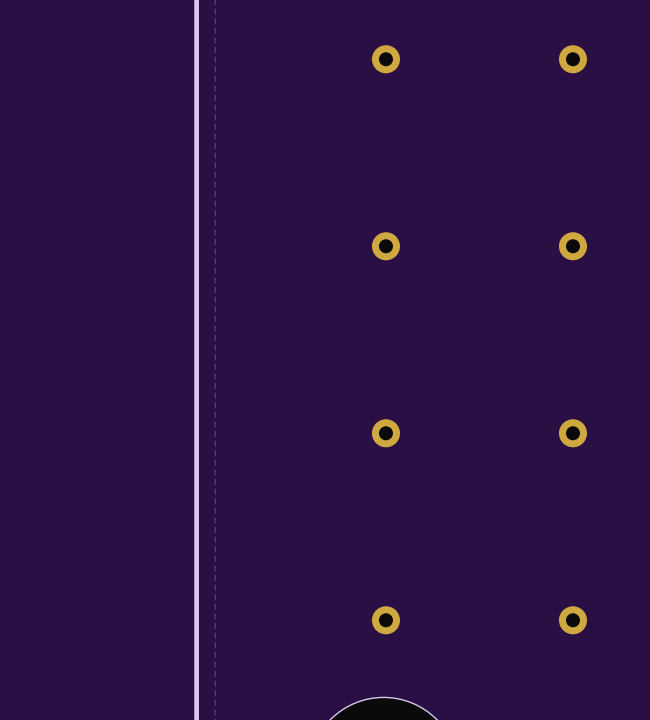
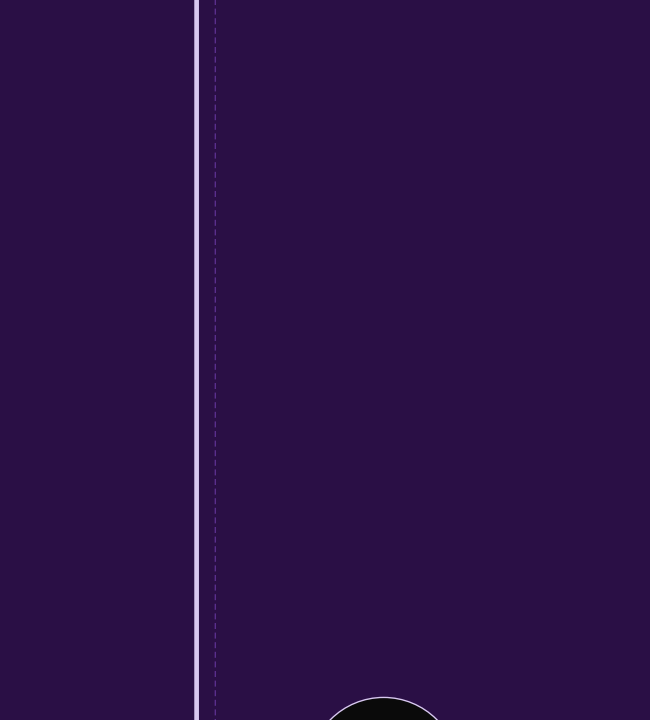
via: (385, 59) -> none
via: (572, 59) -> none
via: (385, 246) -> none
via: (572, 246) -> none
via: (385, 433) -> none
via: (572, 433) -> none
via: (385, 620) -> none
via: (572, 620) -> none

